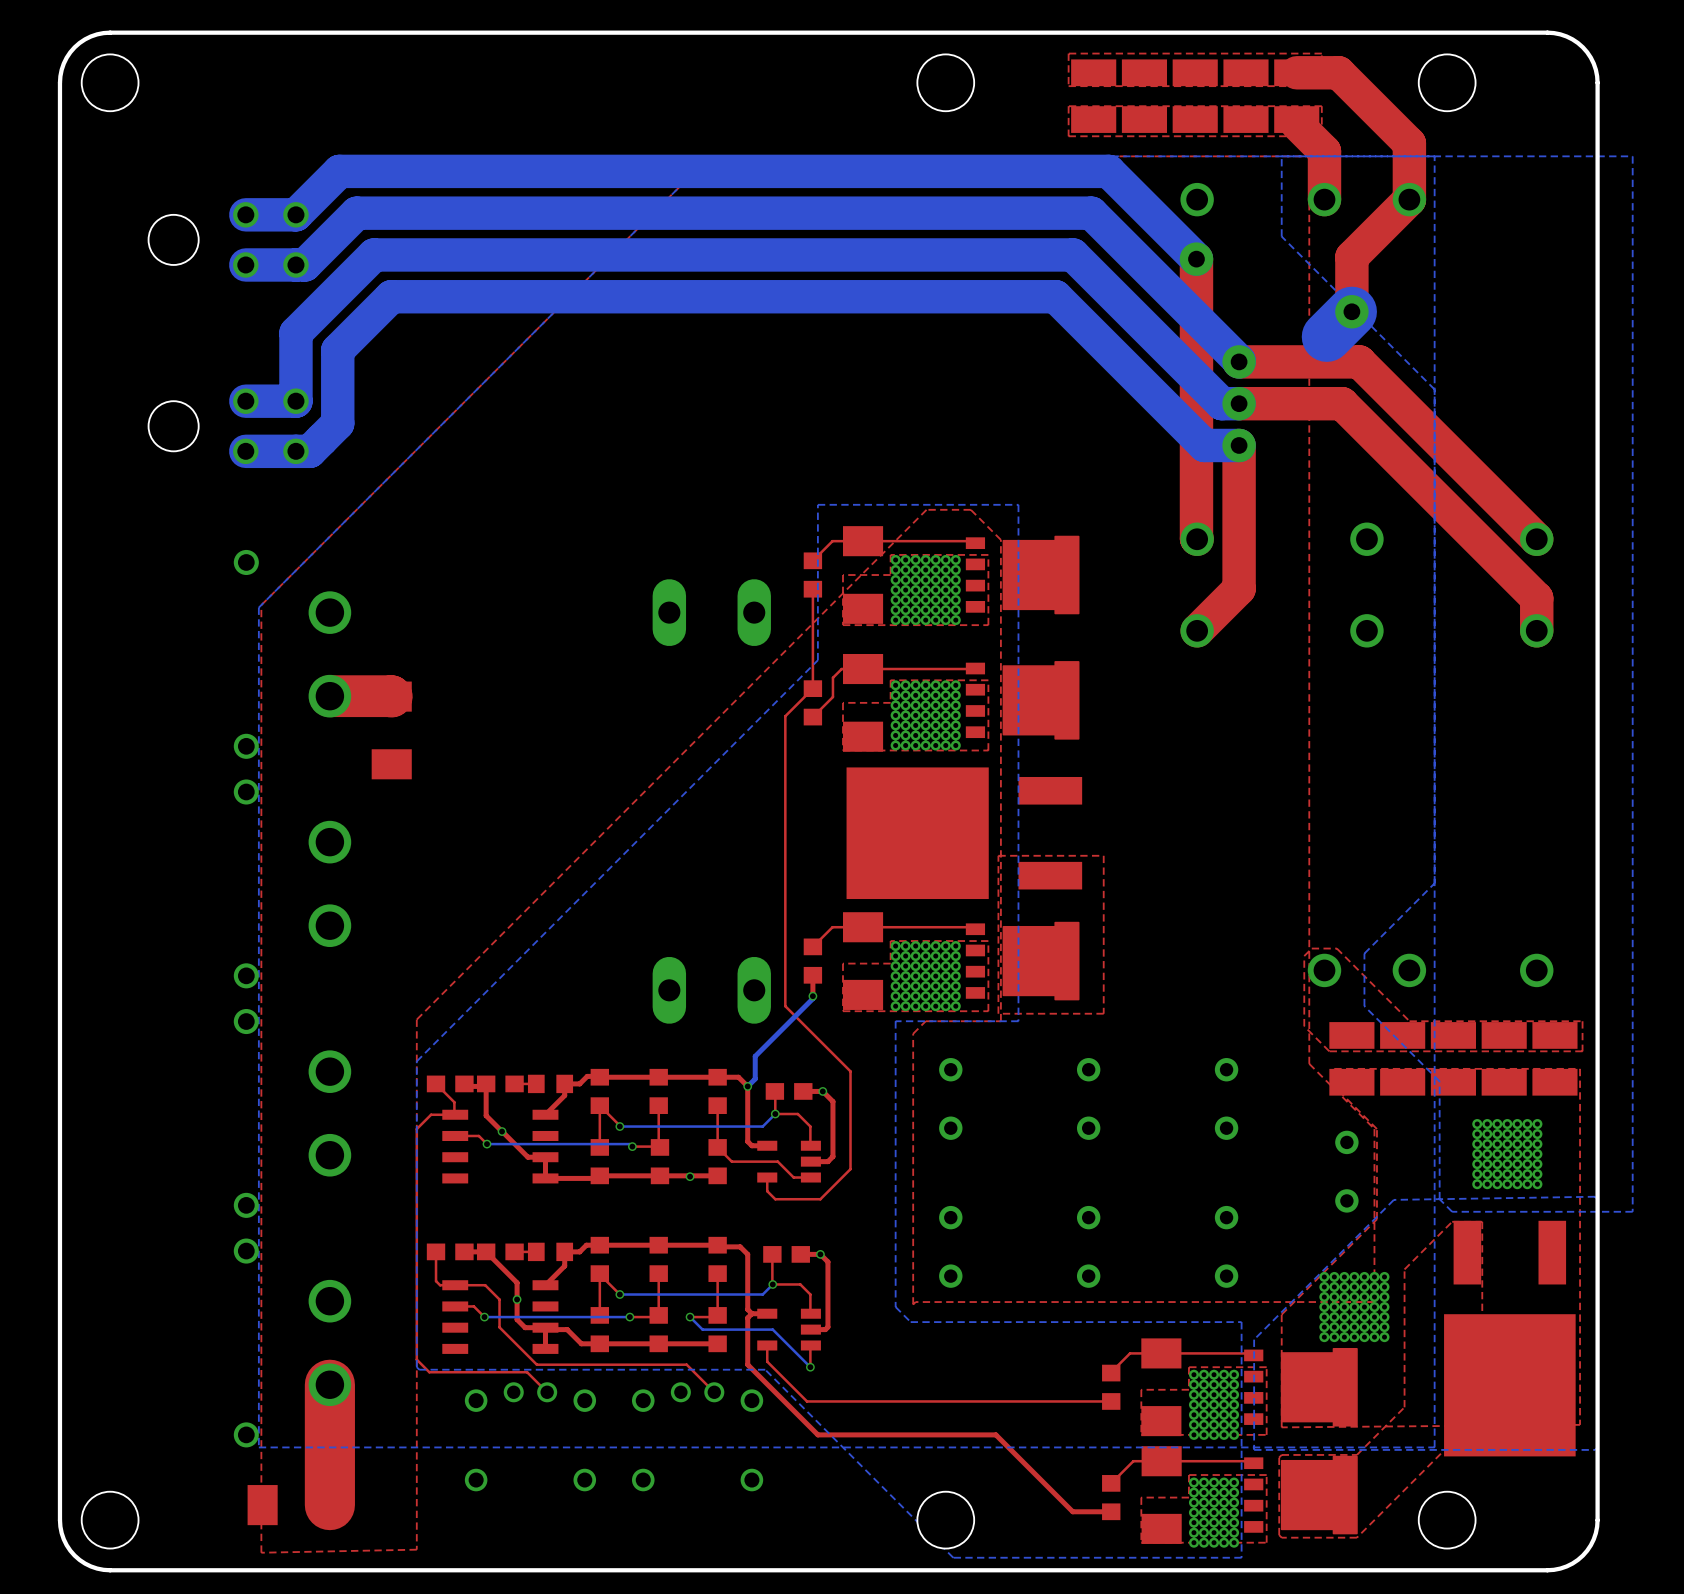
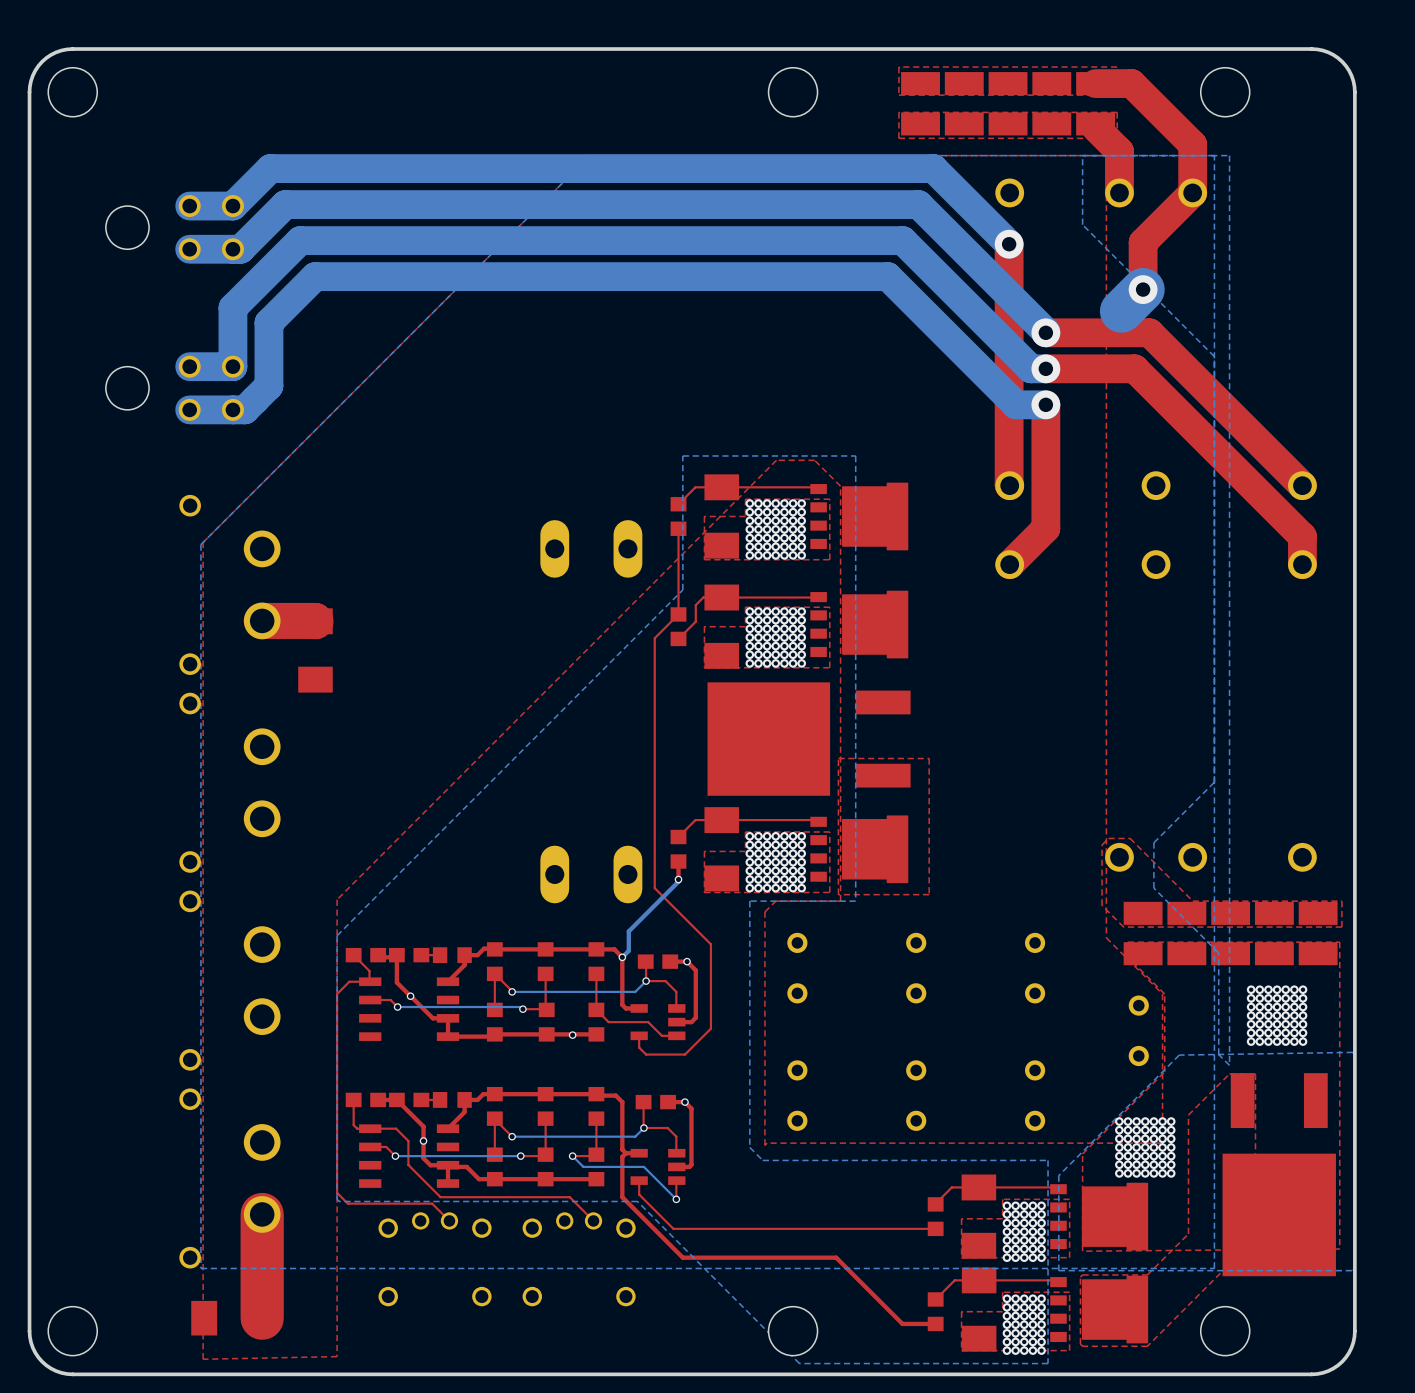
bottom zone outline: (1452, 156) (1632, 156) (1632, 1211) (1452, 1211) -> (1229, 155) (1229, 1065)

